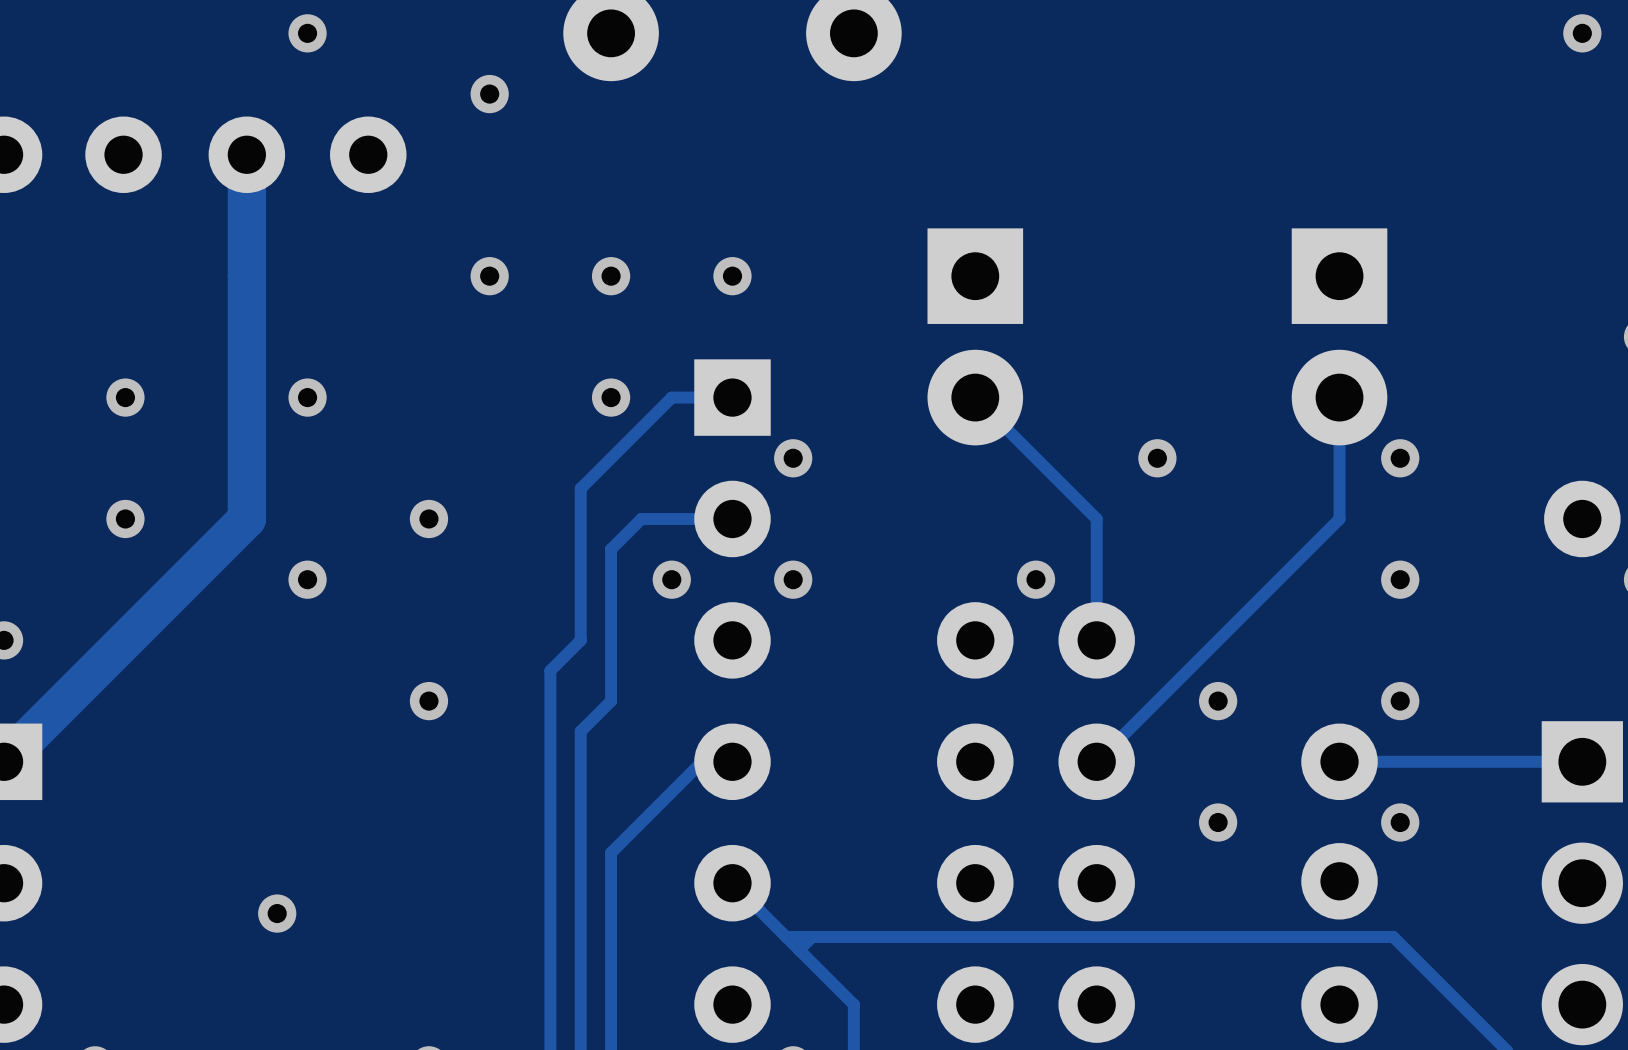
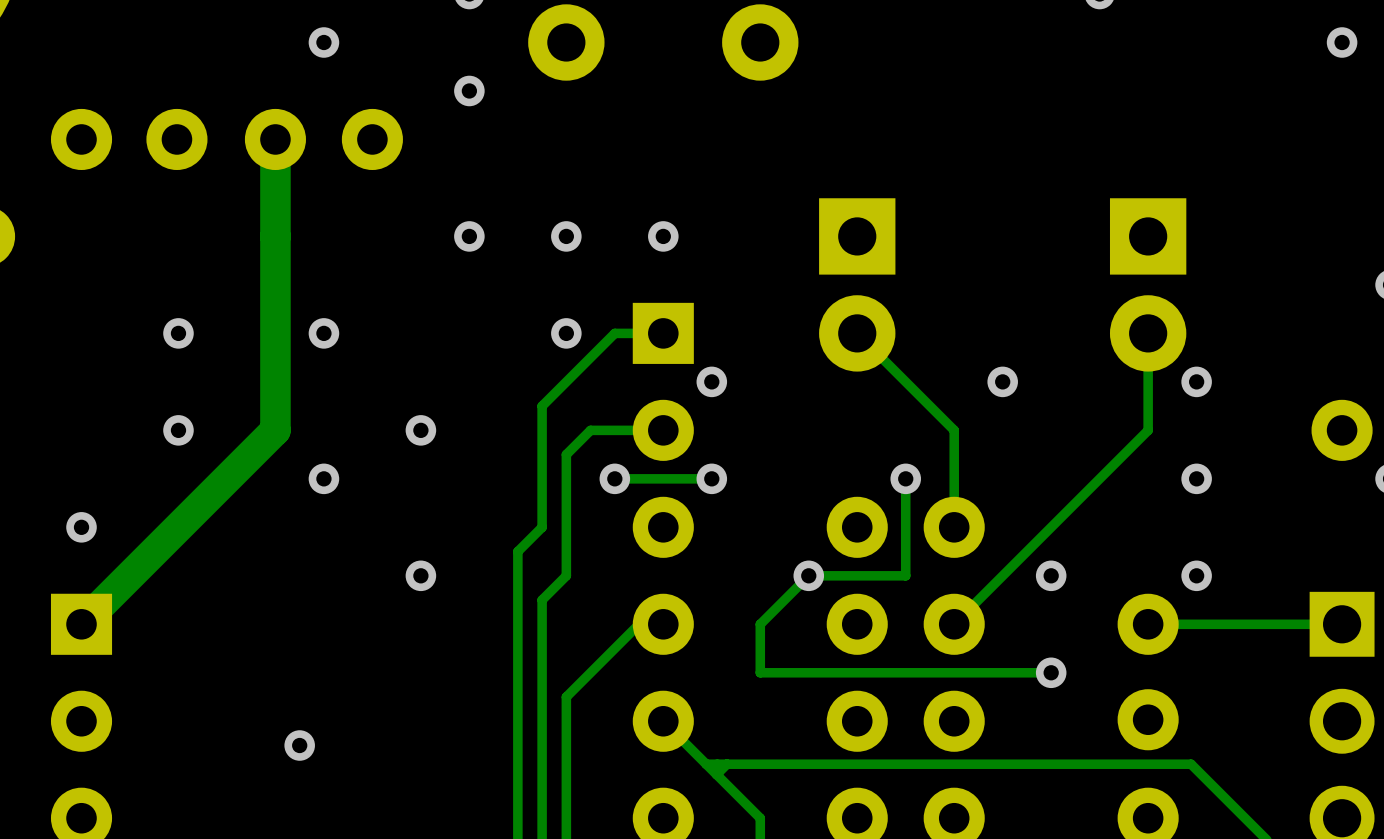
track: none -> (711, 478) (614, 478)
track: none -> (905, 478) (905, 575) (808, 575) (760, 624) (760, 672) (1051, 672)
via: none -> (808, 575)
via: (1400, 822) -> none

